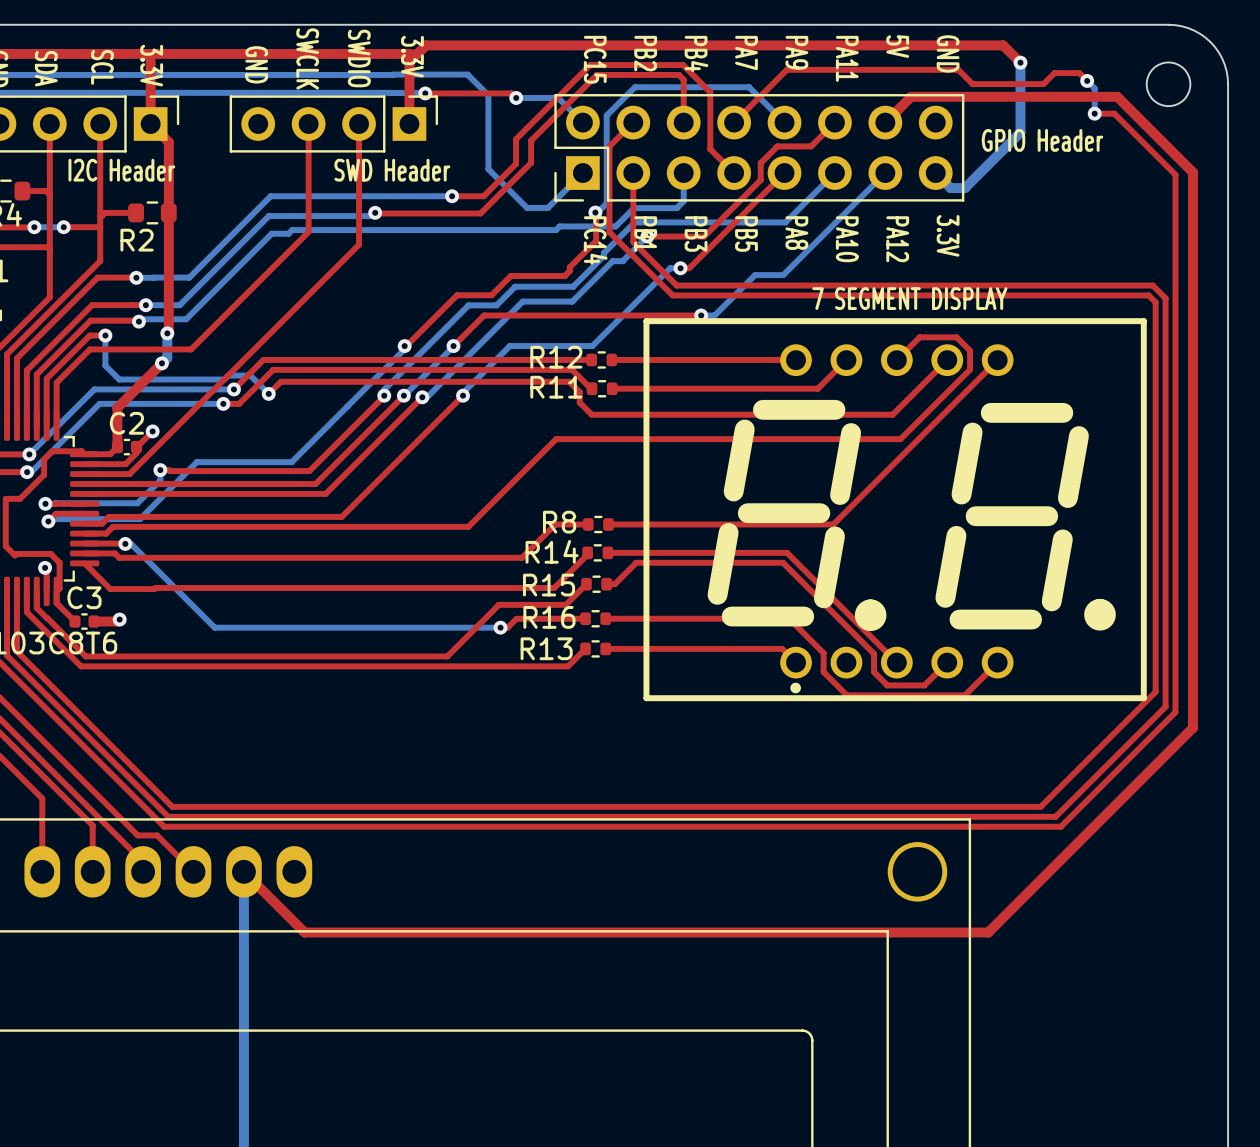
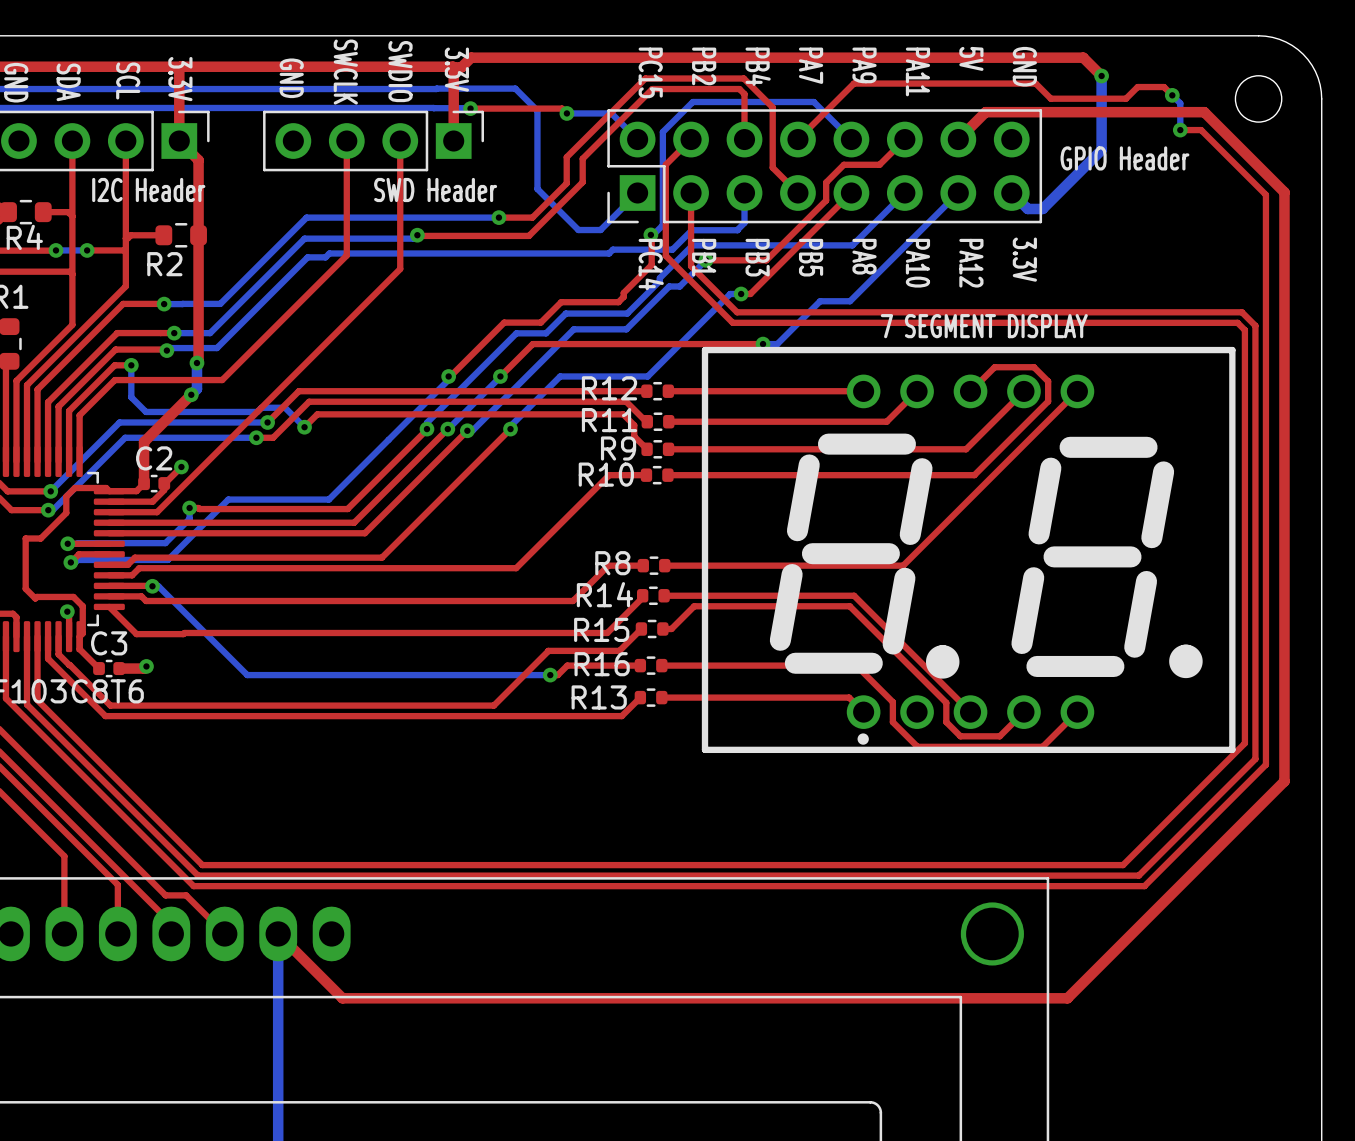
top track: (591, 414) (612, 414) -> none
R9: none -> (657, 449)
top track: (591, 439) (611, 439) -> none
R10: none -> (657, 475)

